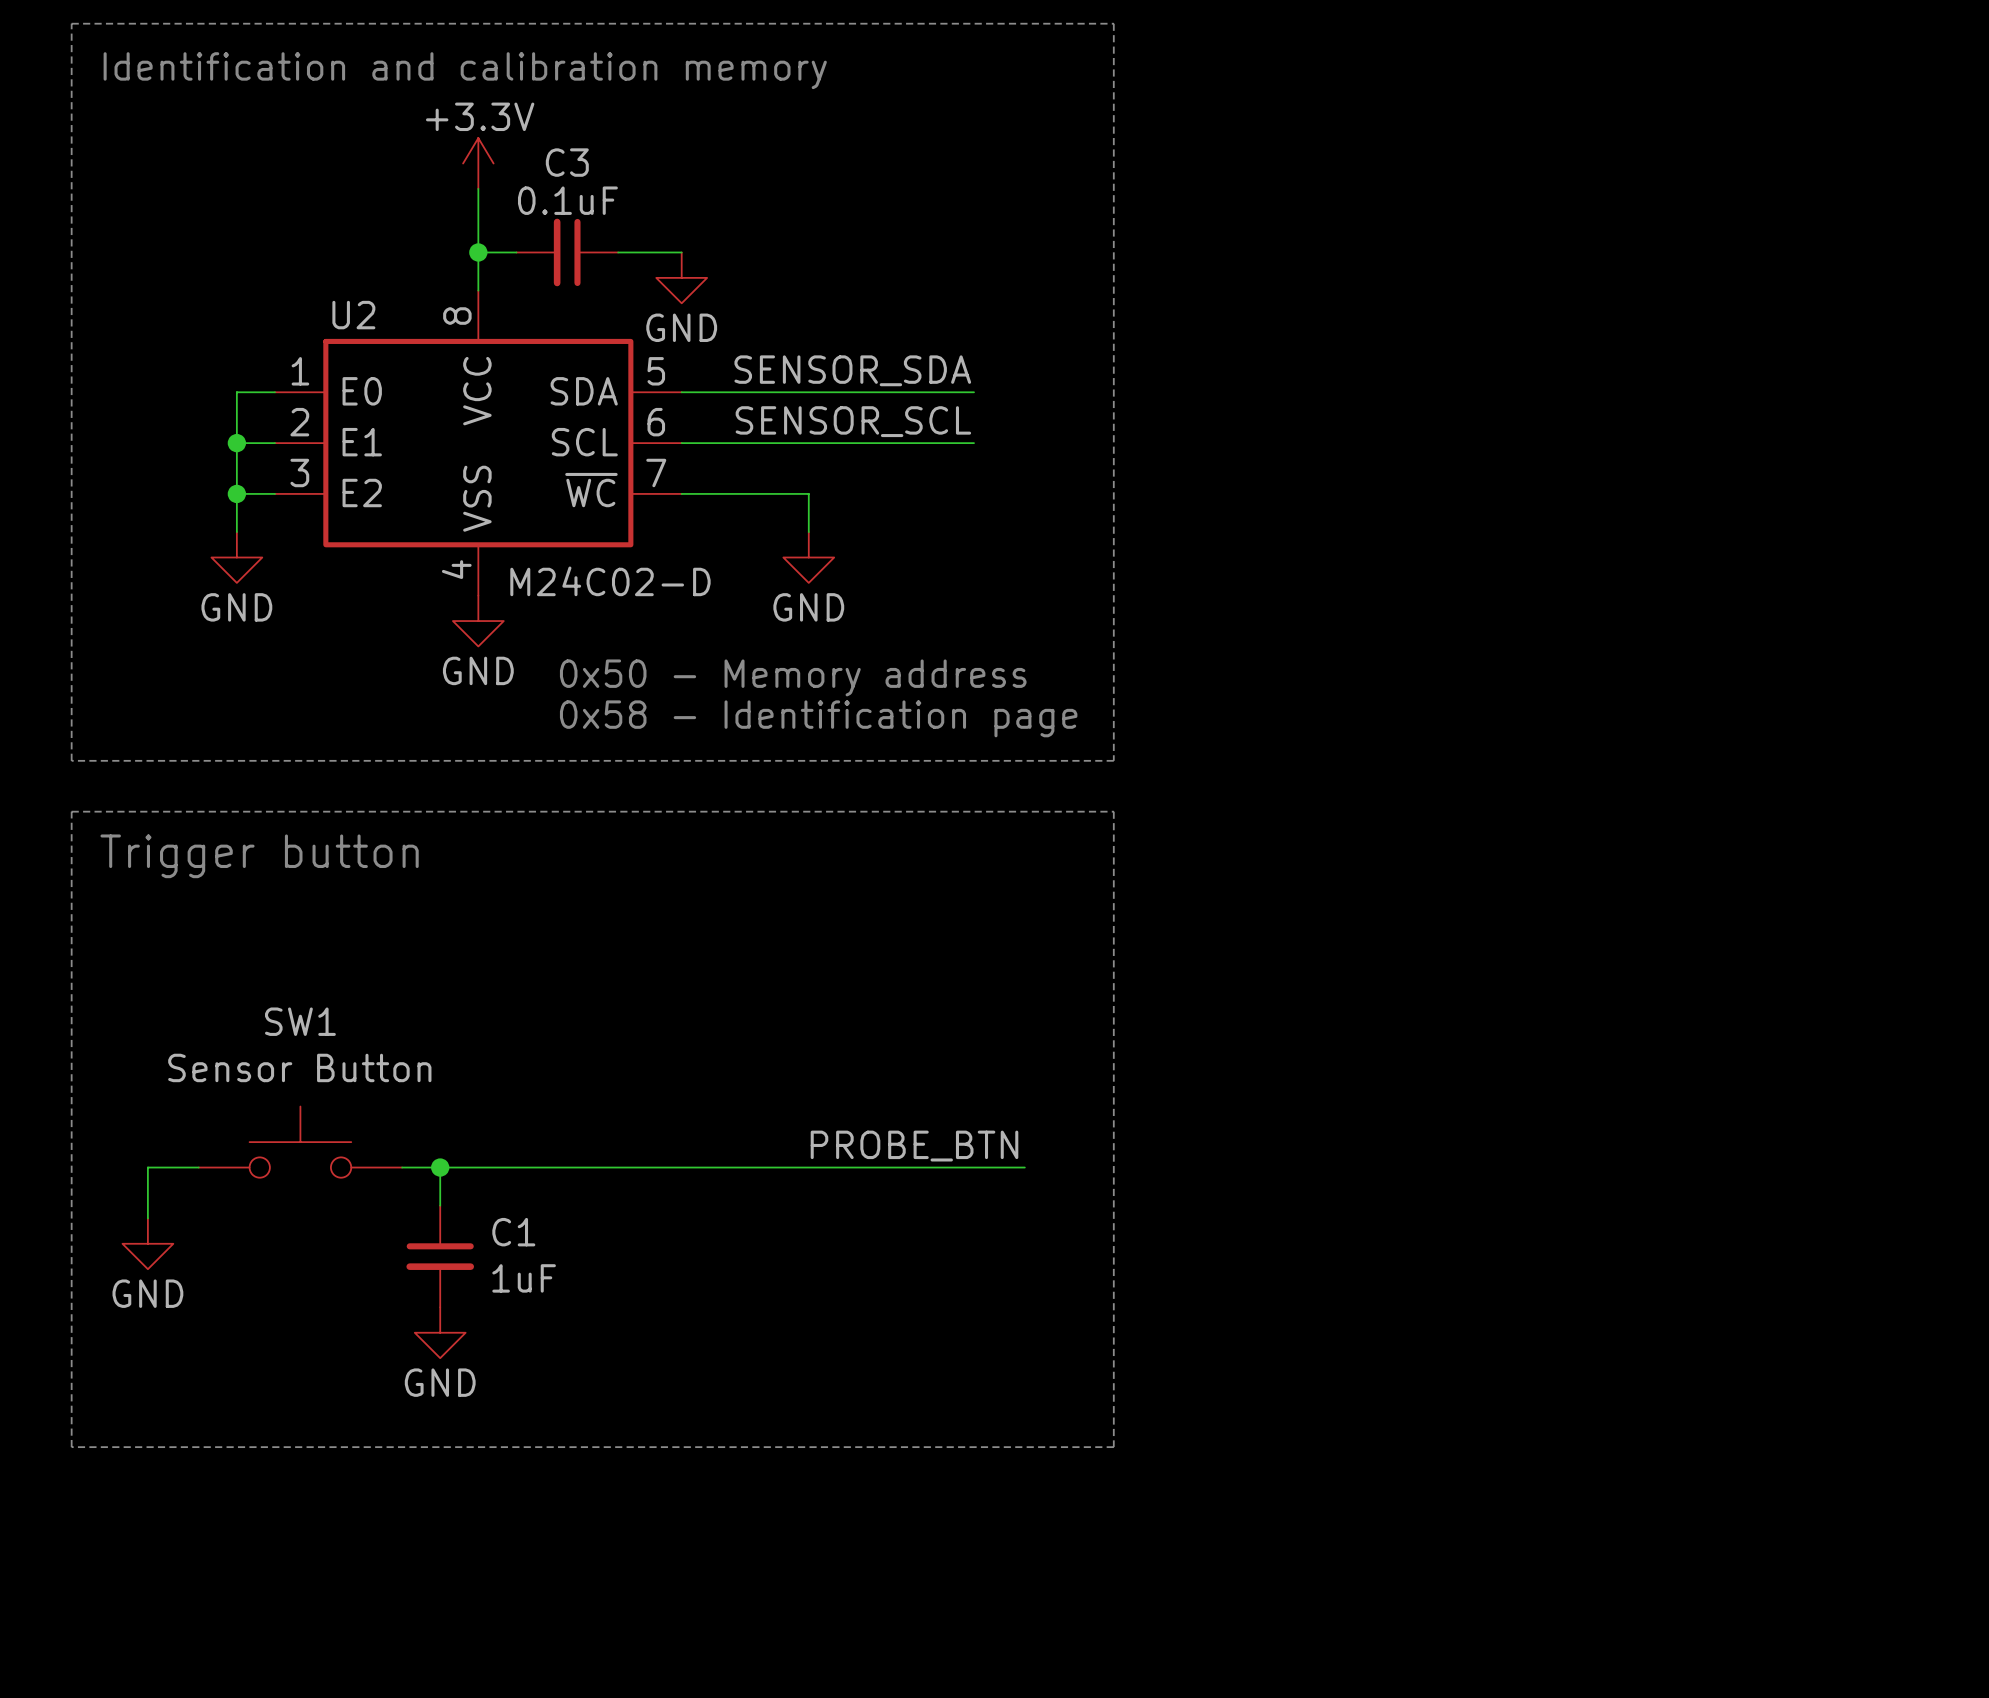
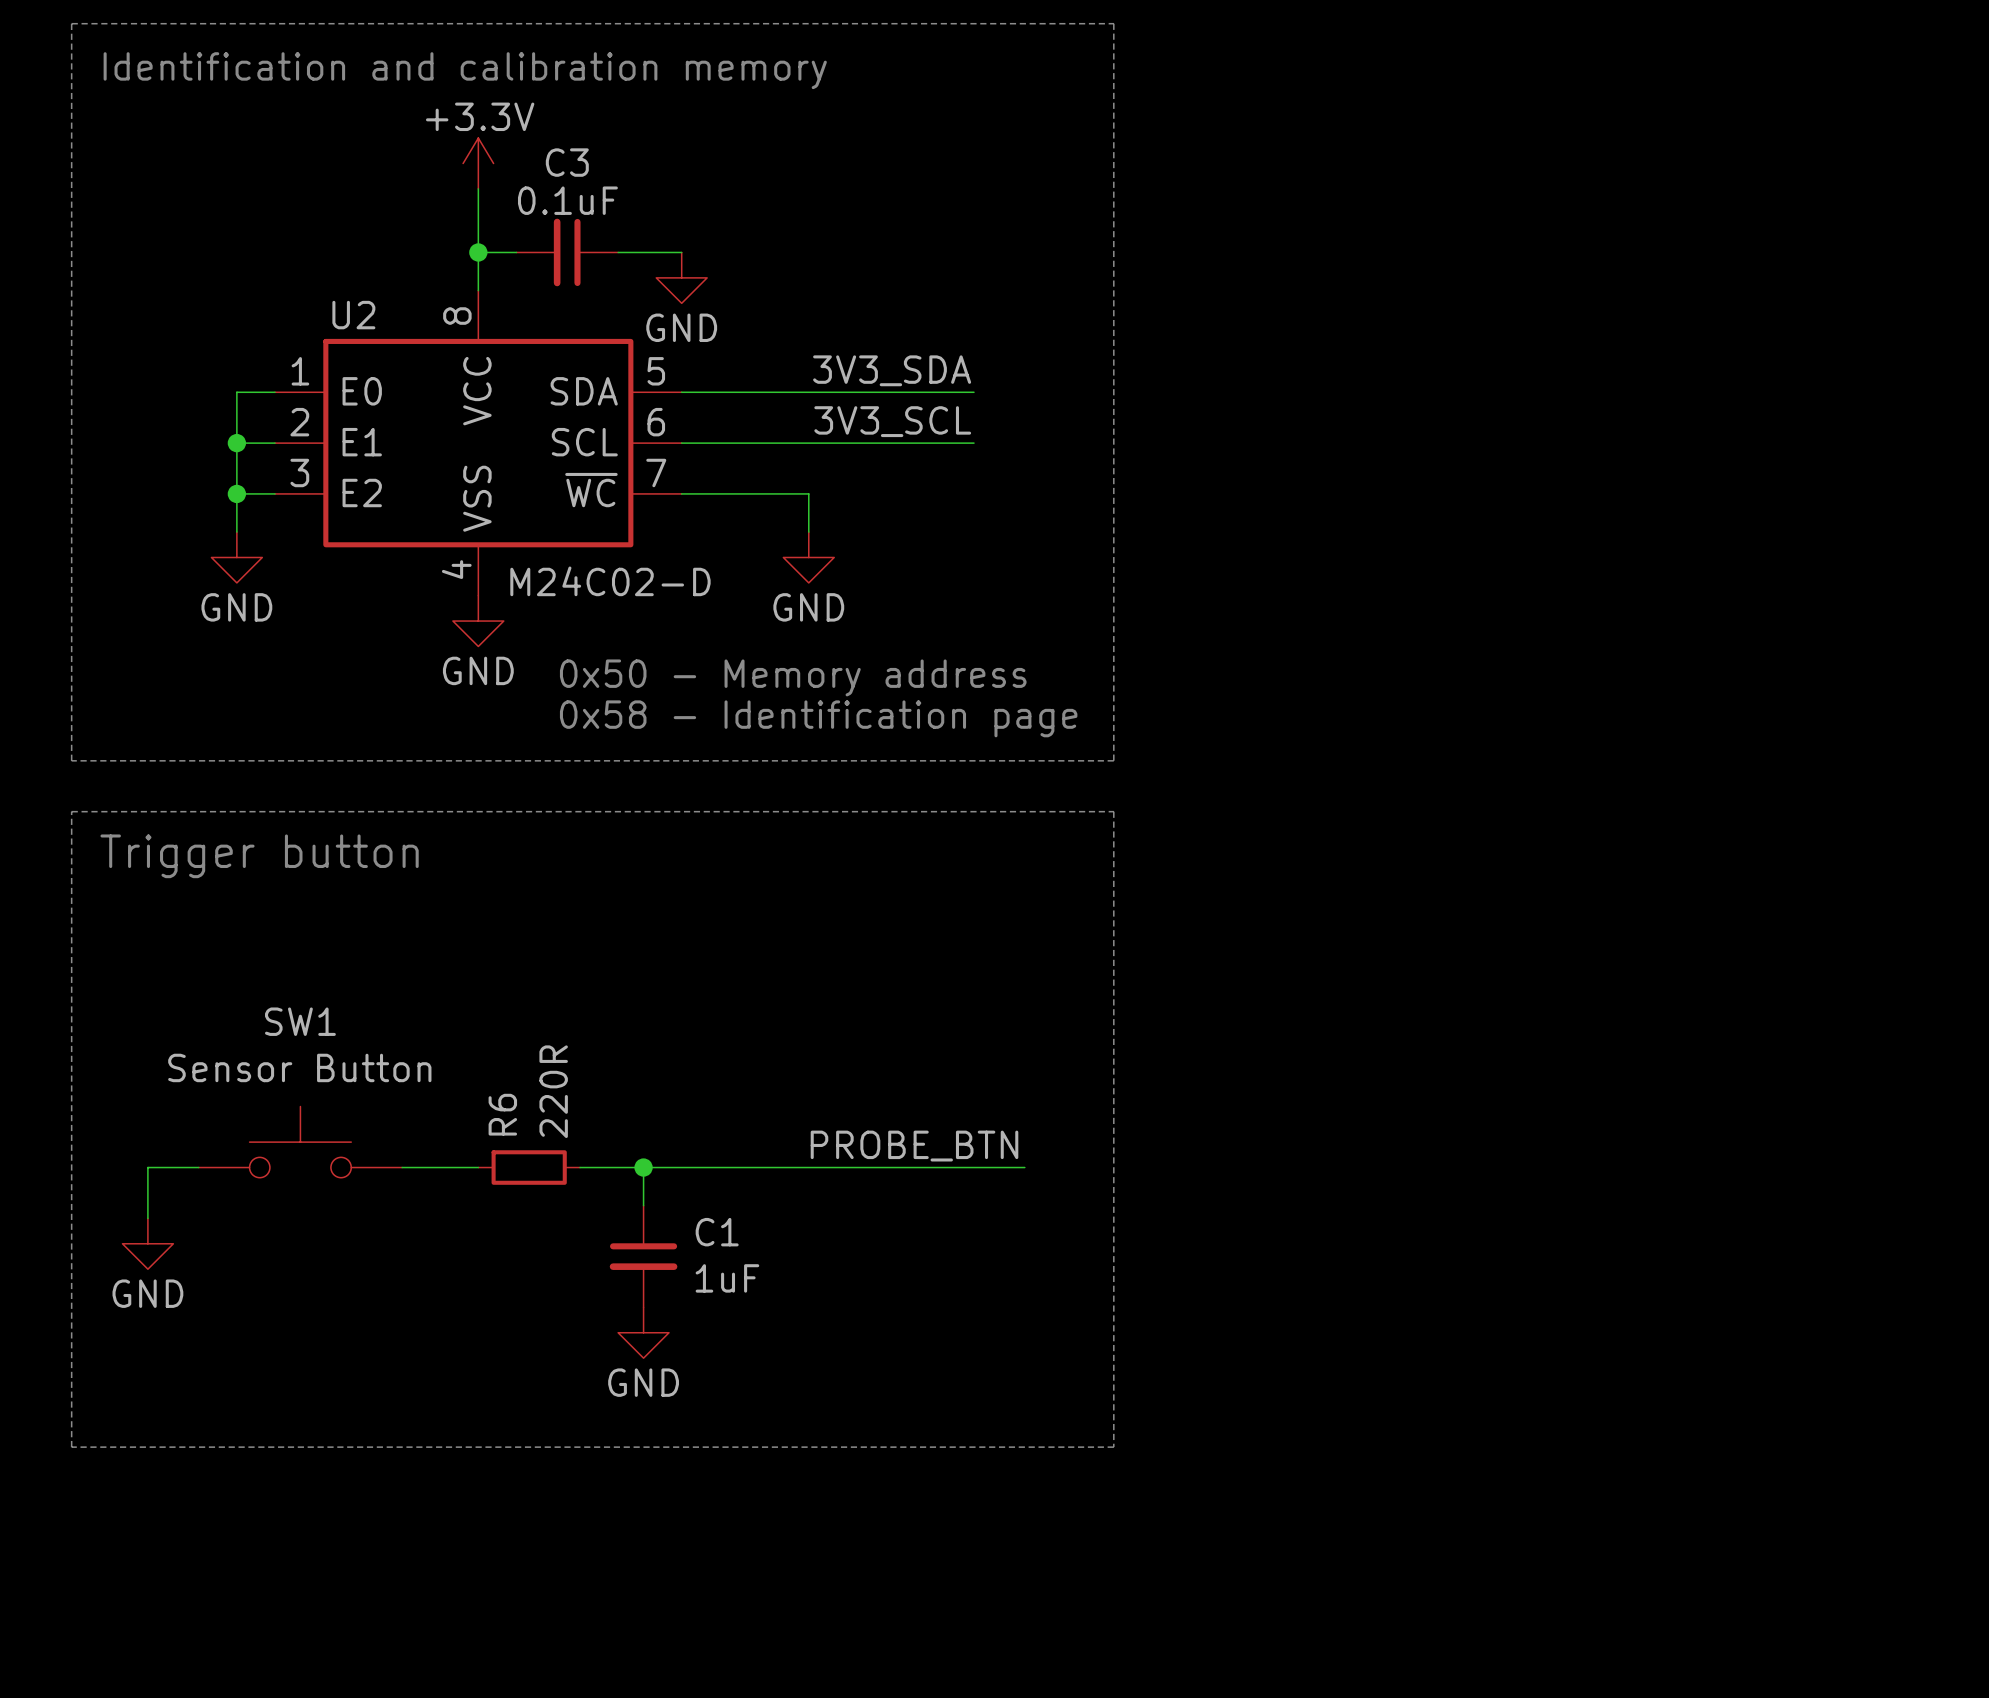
label: SENSOR_SDA (852, 370) -> 3V3_SDA (892, 370)
label: SENSOR_SCL (853, 421) -> 3V3_SCL (892, 421)
wire: (440, 1167) (440, 1205) -> (643, 1167) (643, 1205)
junction: (440, 1167) -> none
wire: (478, 1167) (580, 1167) -> none
R6: none -> 220R (529, 1167)
junction: none -> (643, 1167)
C1 position: (440, 1256) -> (643, 1256)
power symbol position: GND (440, 1332) -> GND (643, 1332)

